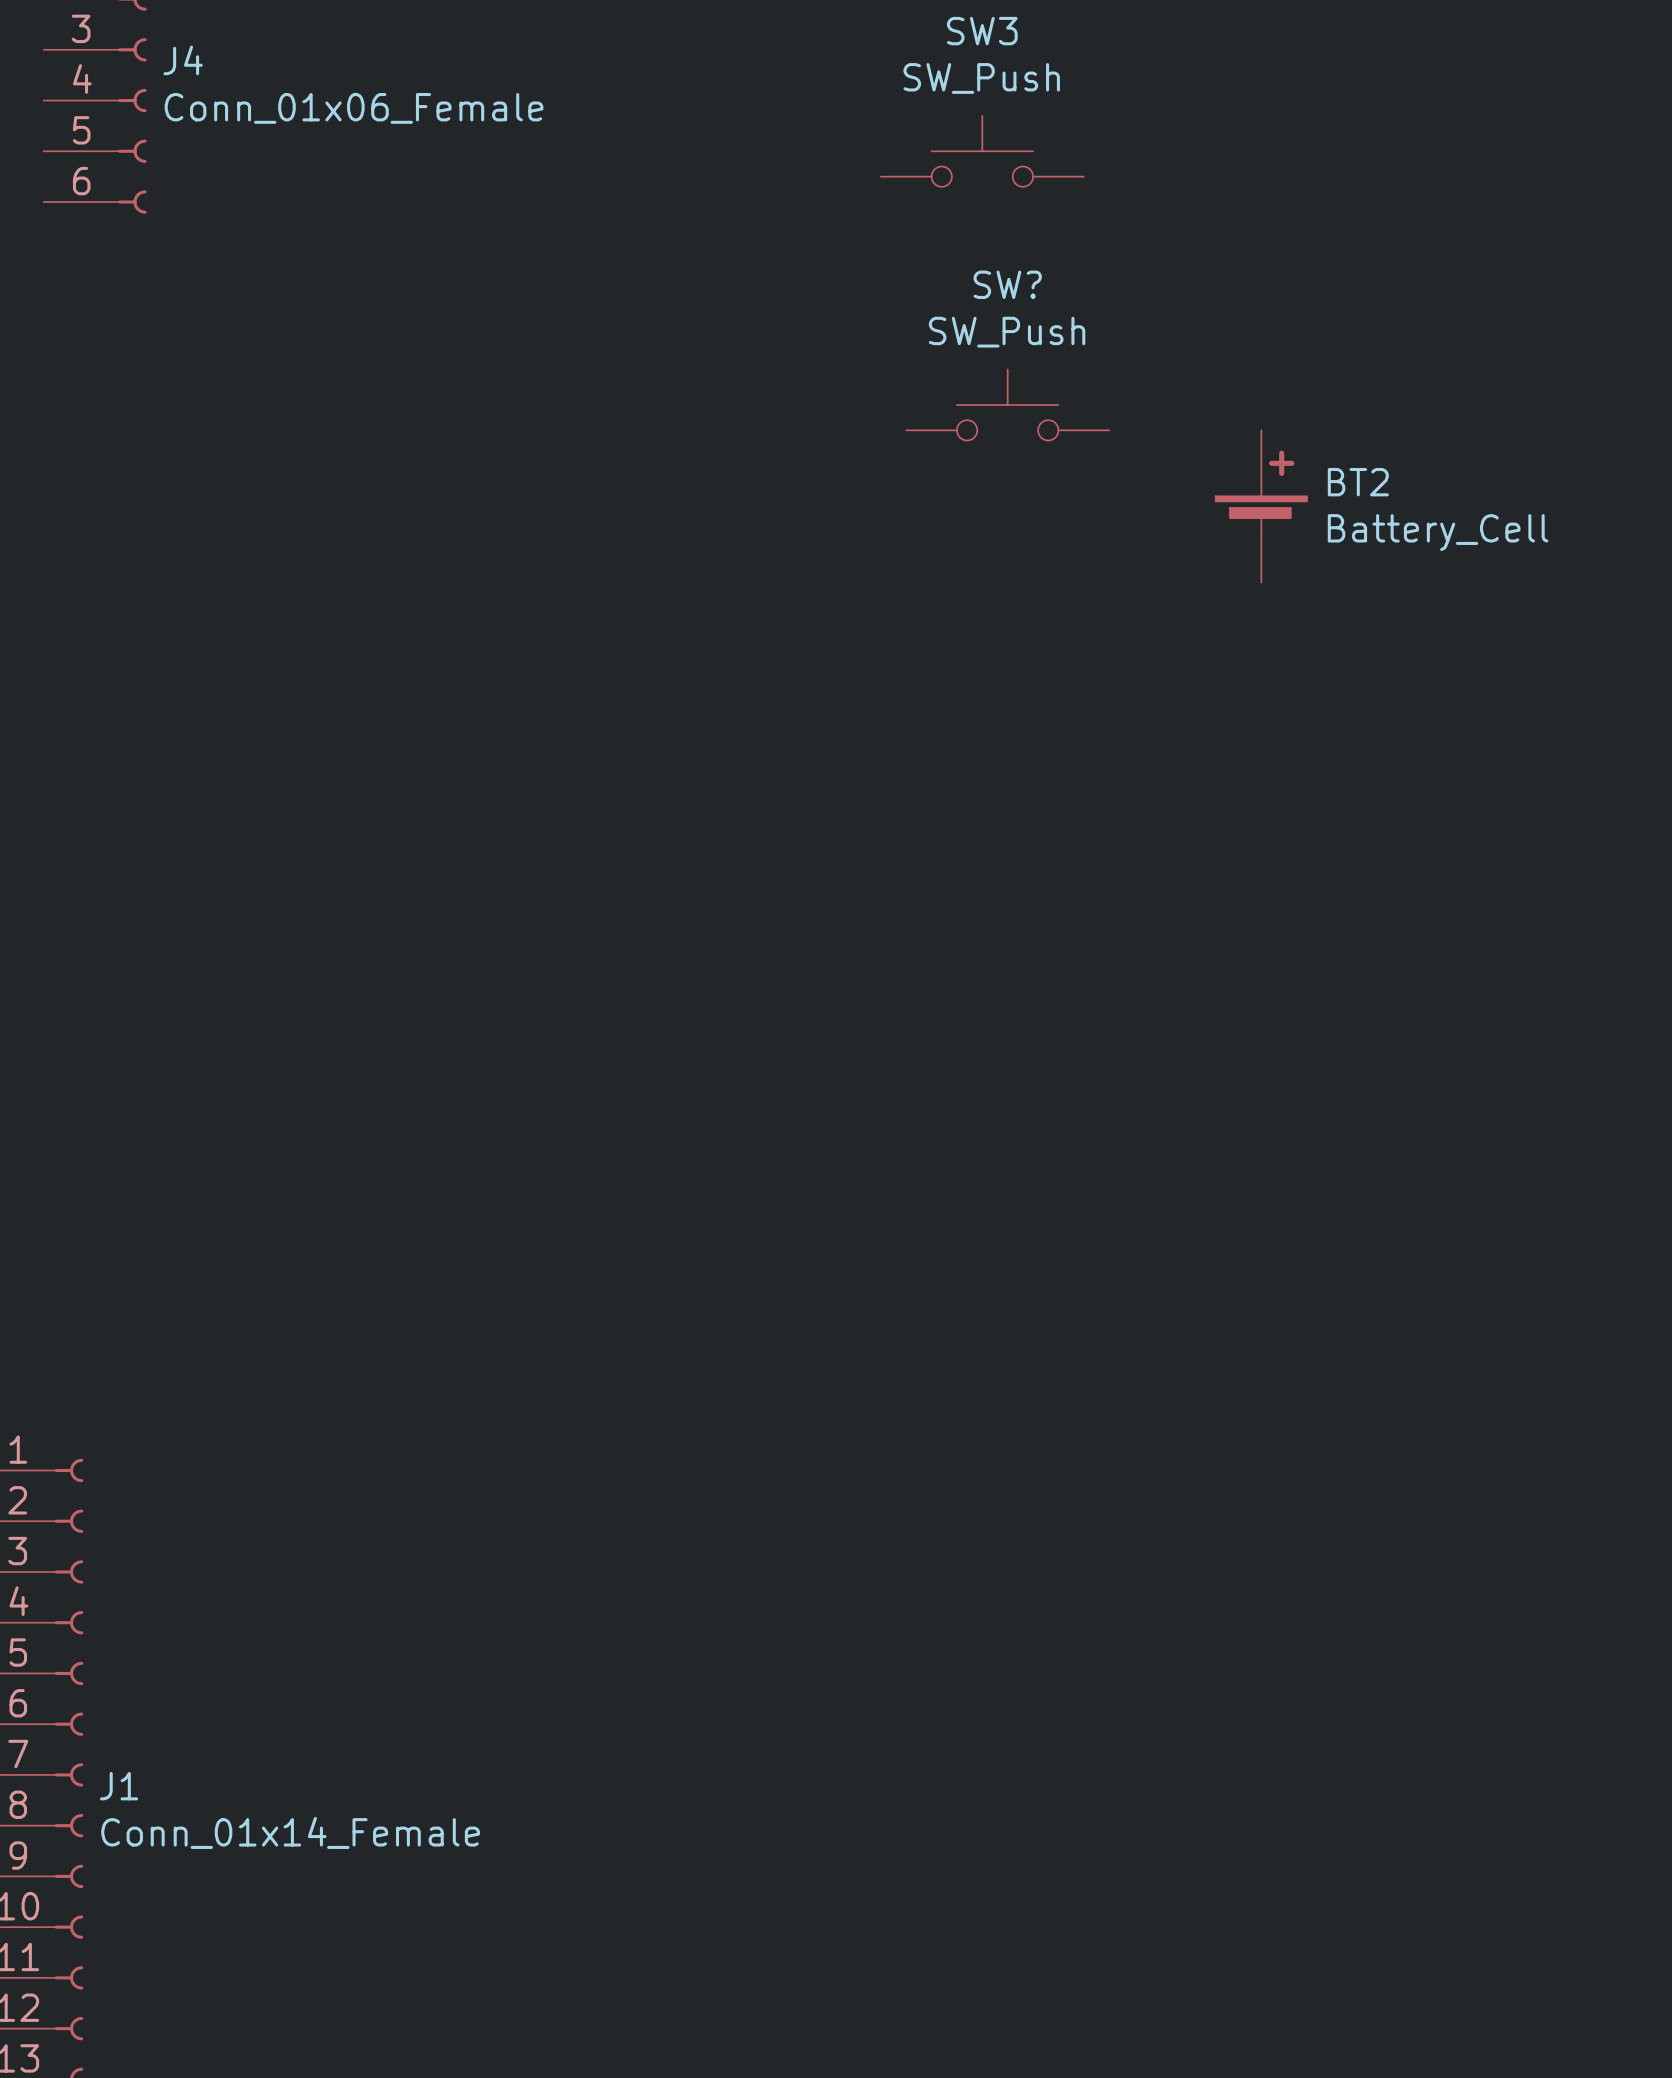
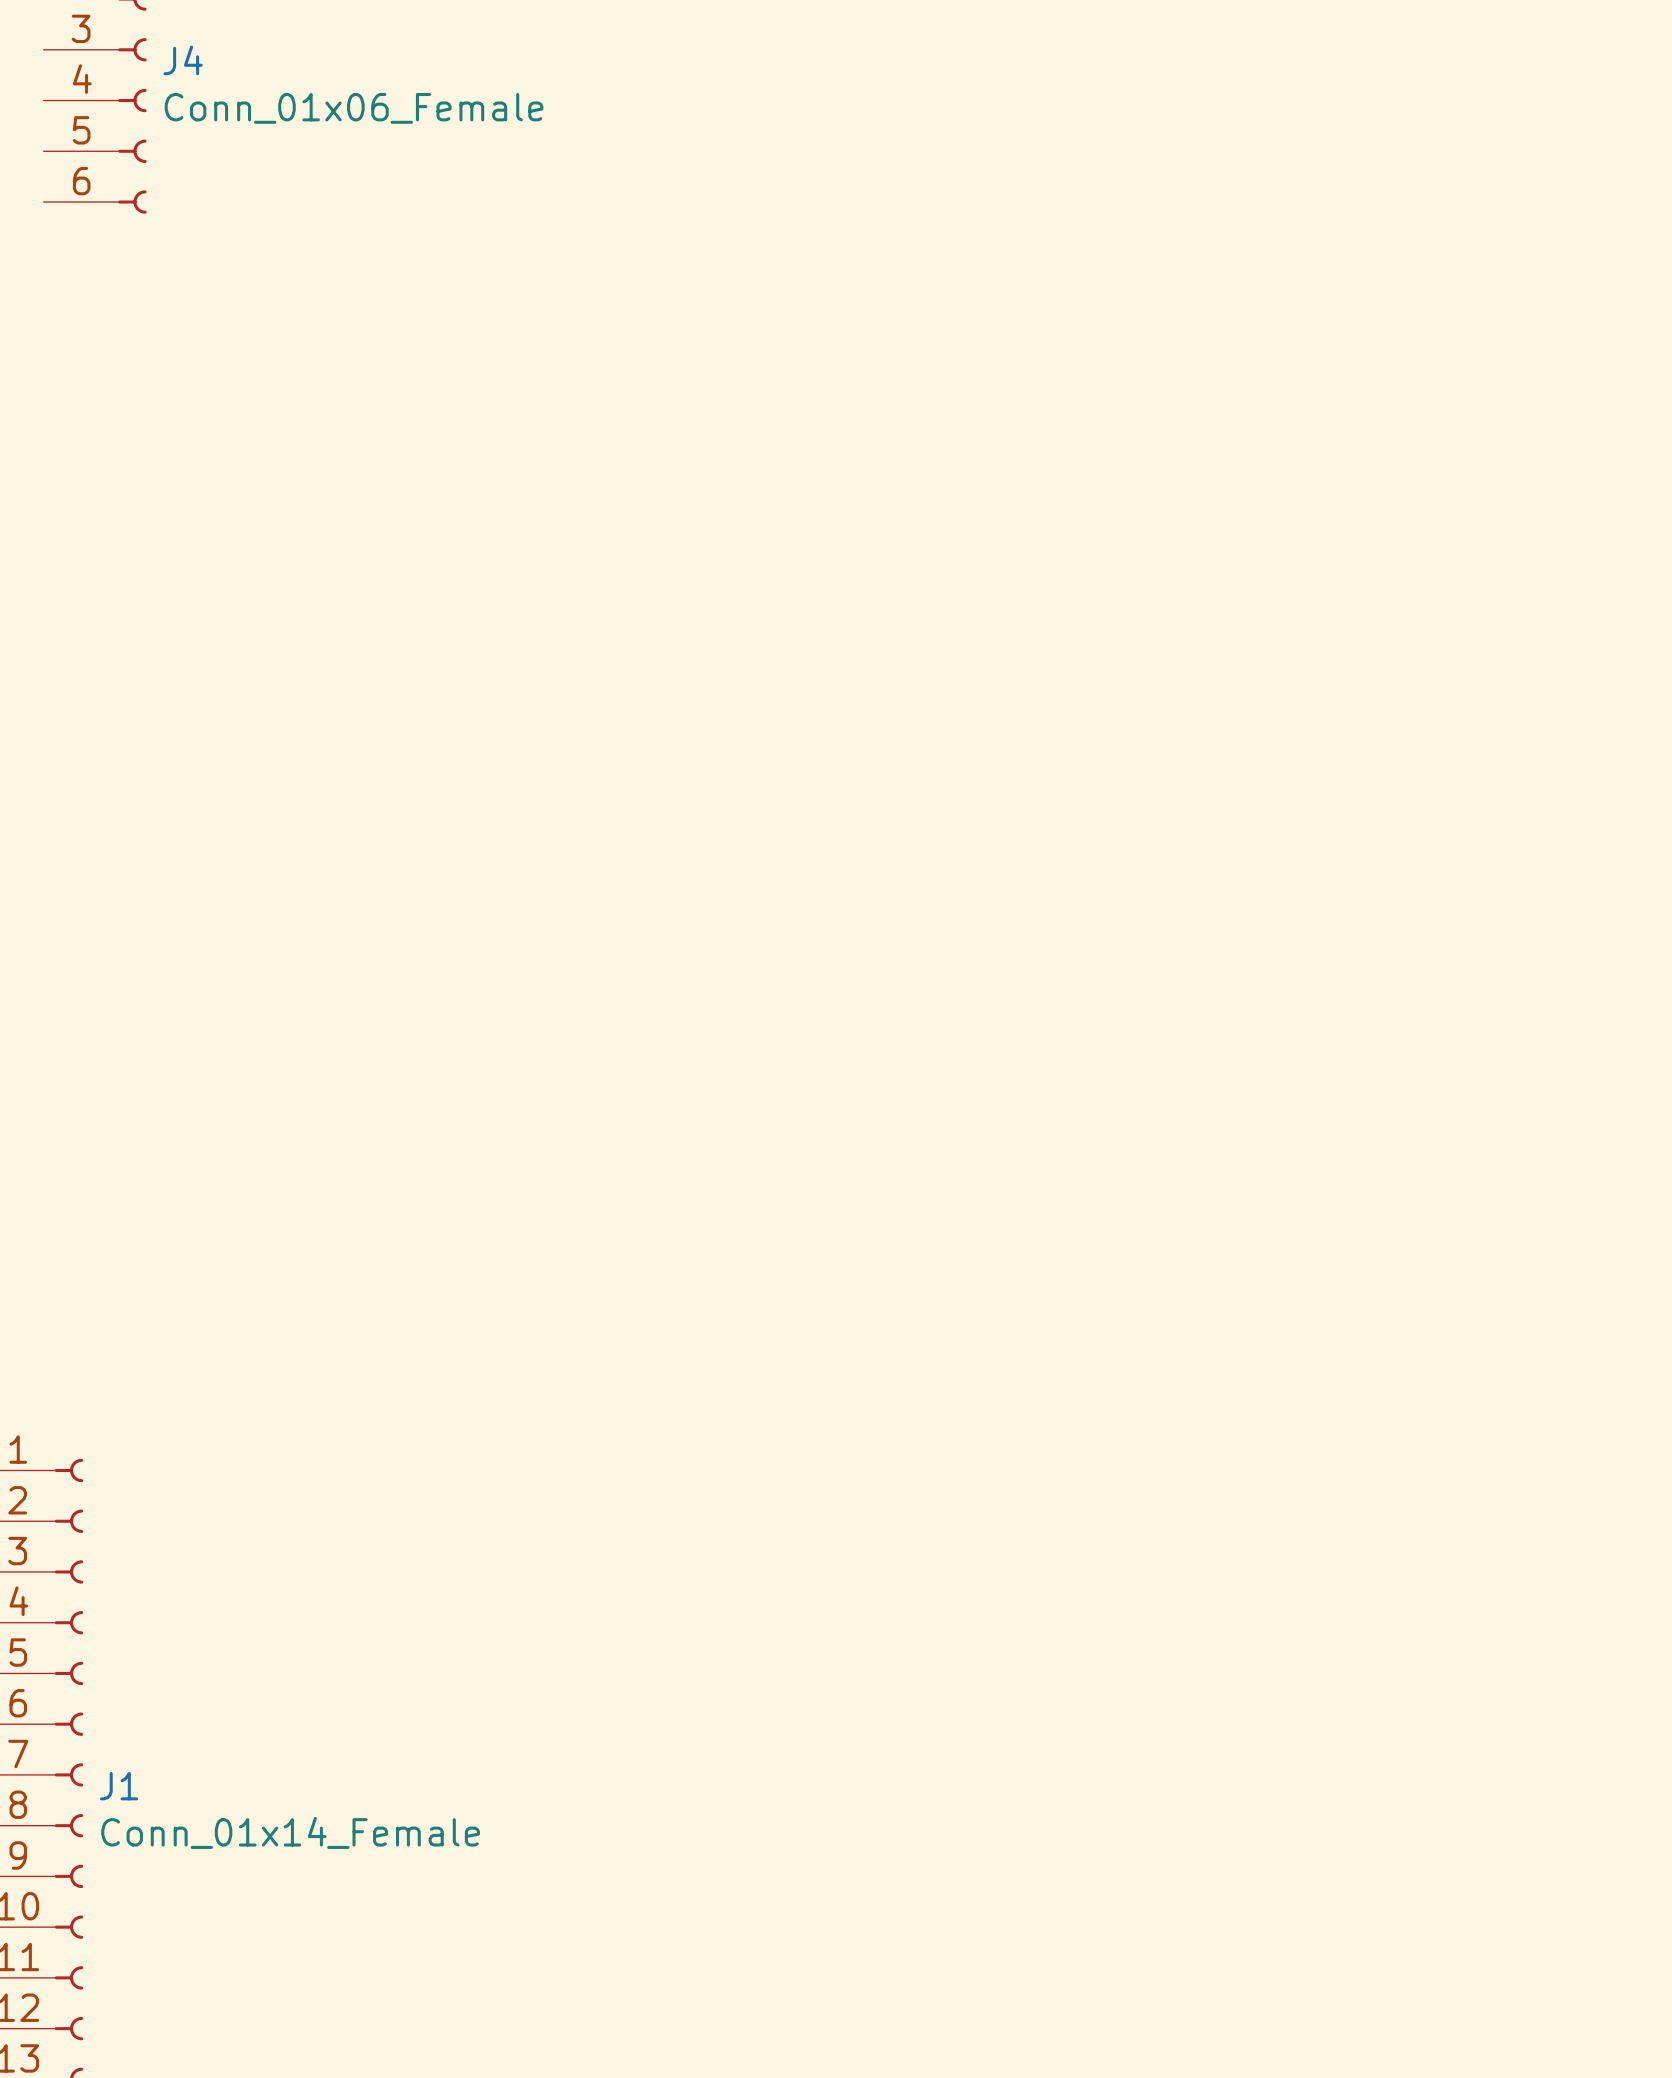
SW3: SW_Push (982, 151) -> none
SW?: SW_Push (1007, 404) -> none
BT2: Battery_Cell (1261, 506) -> none

